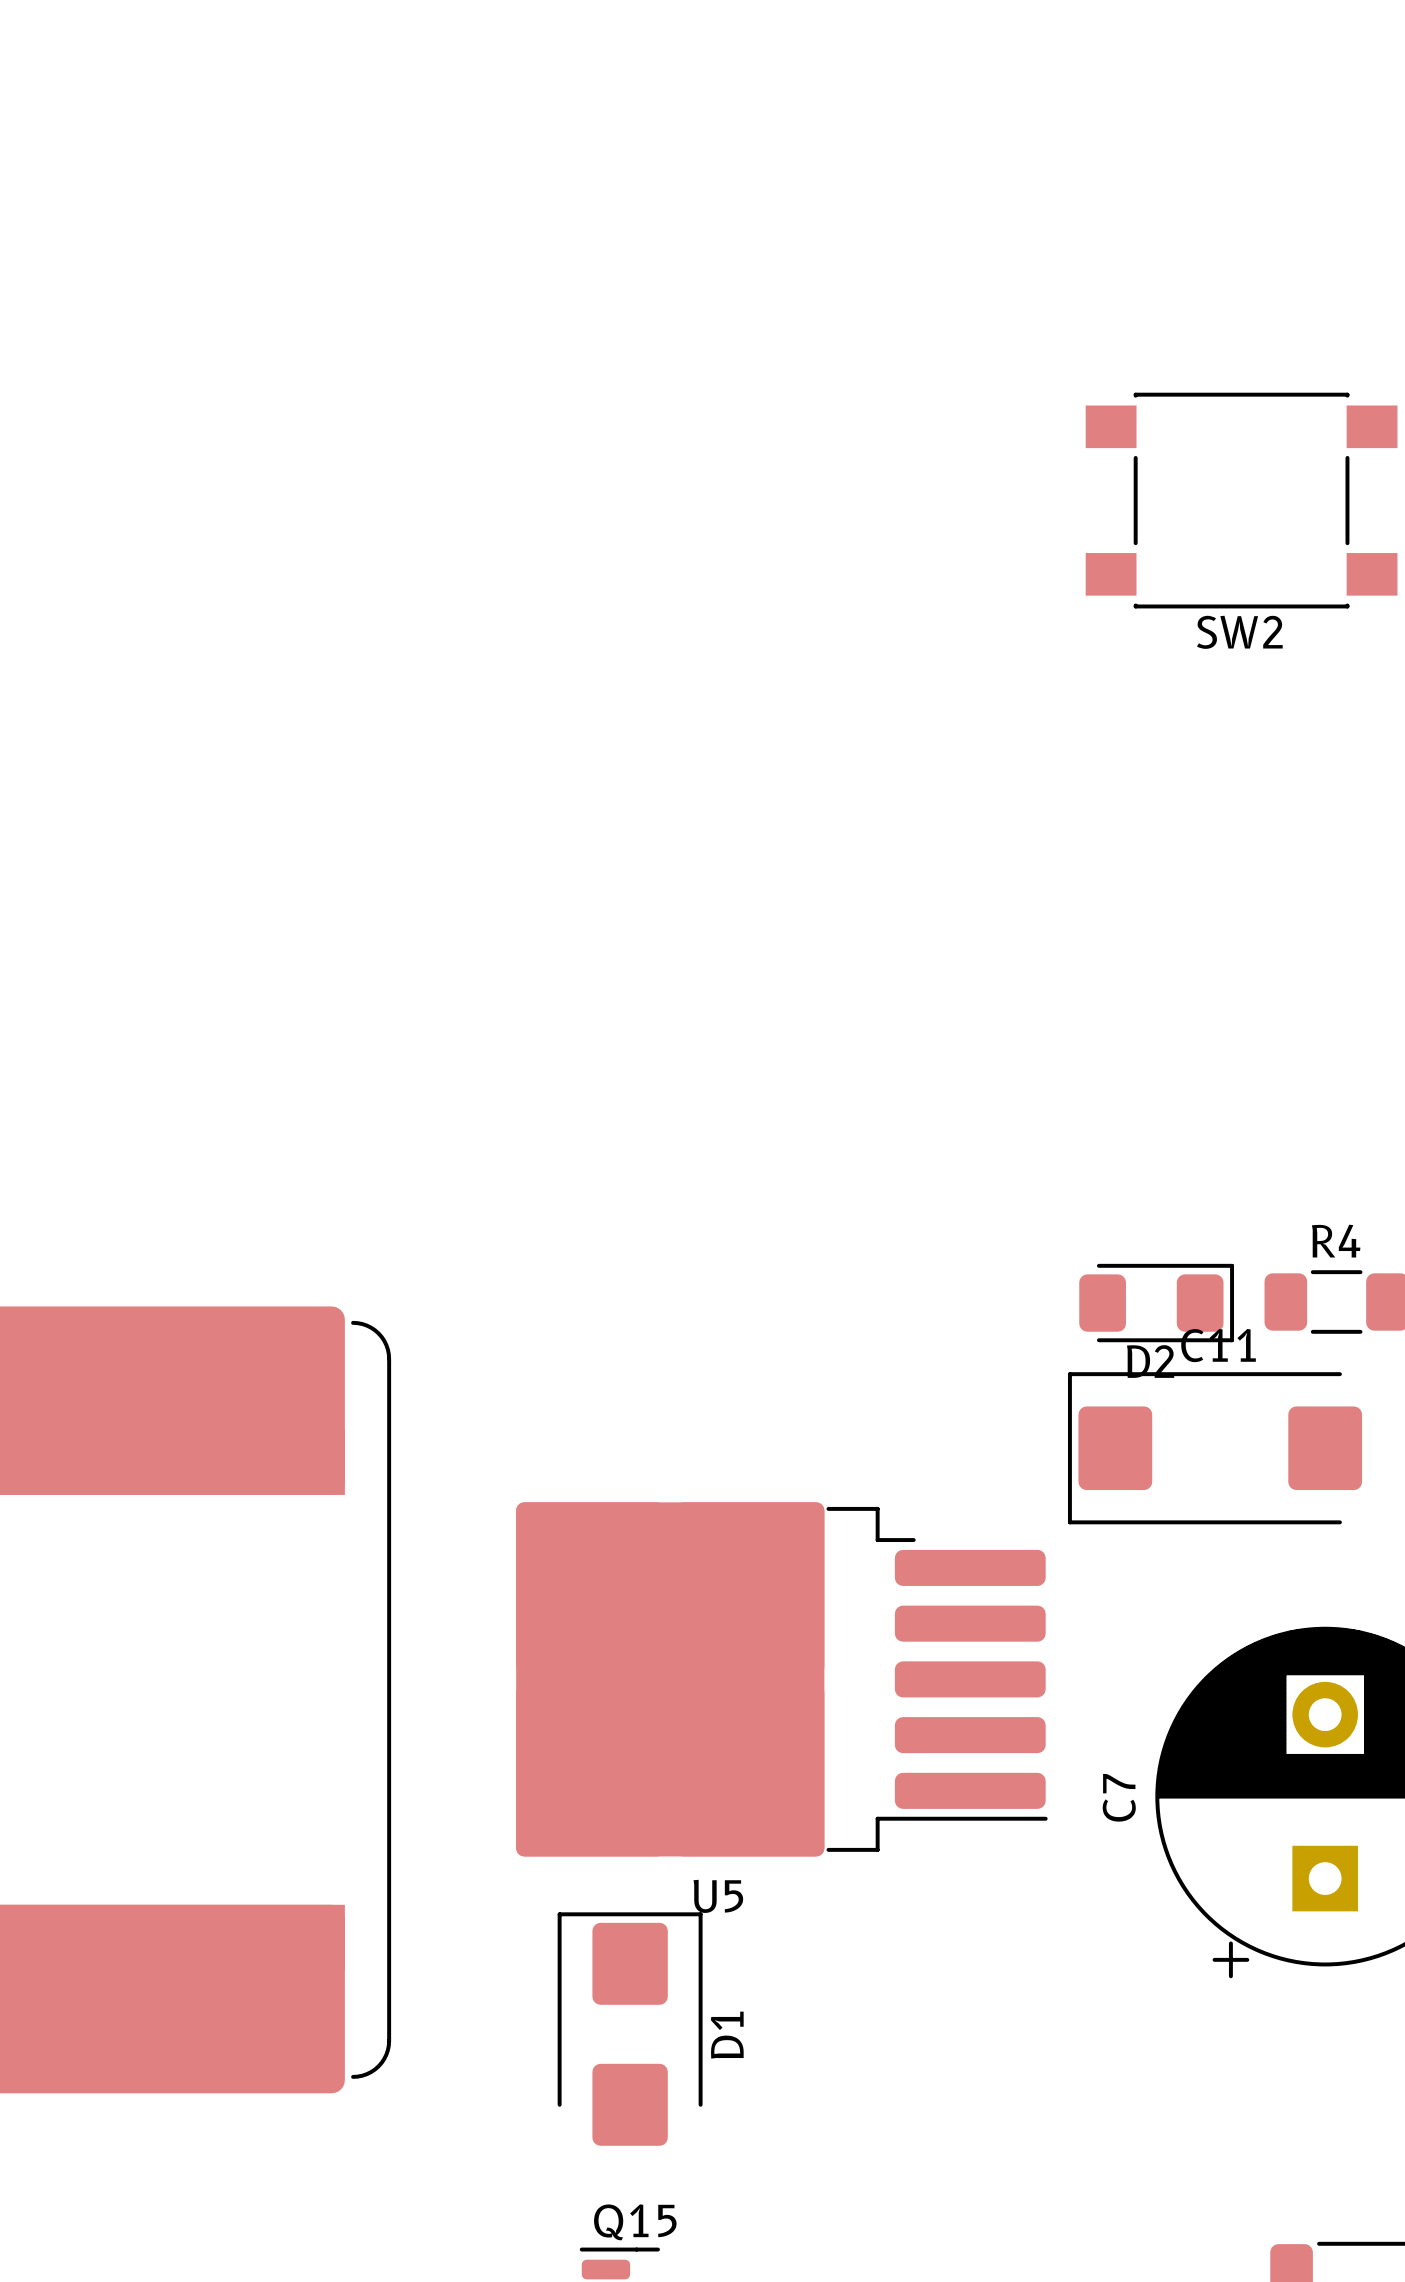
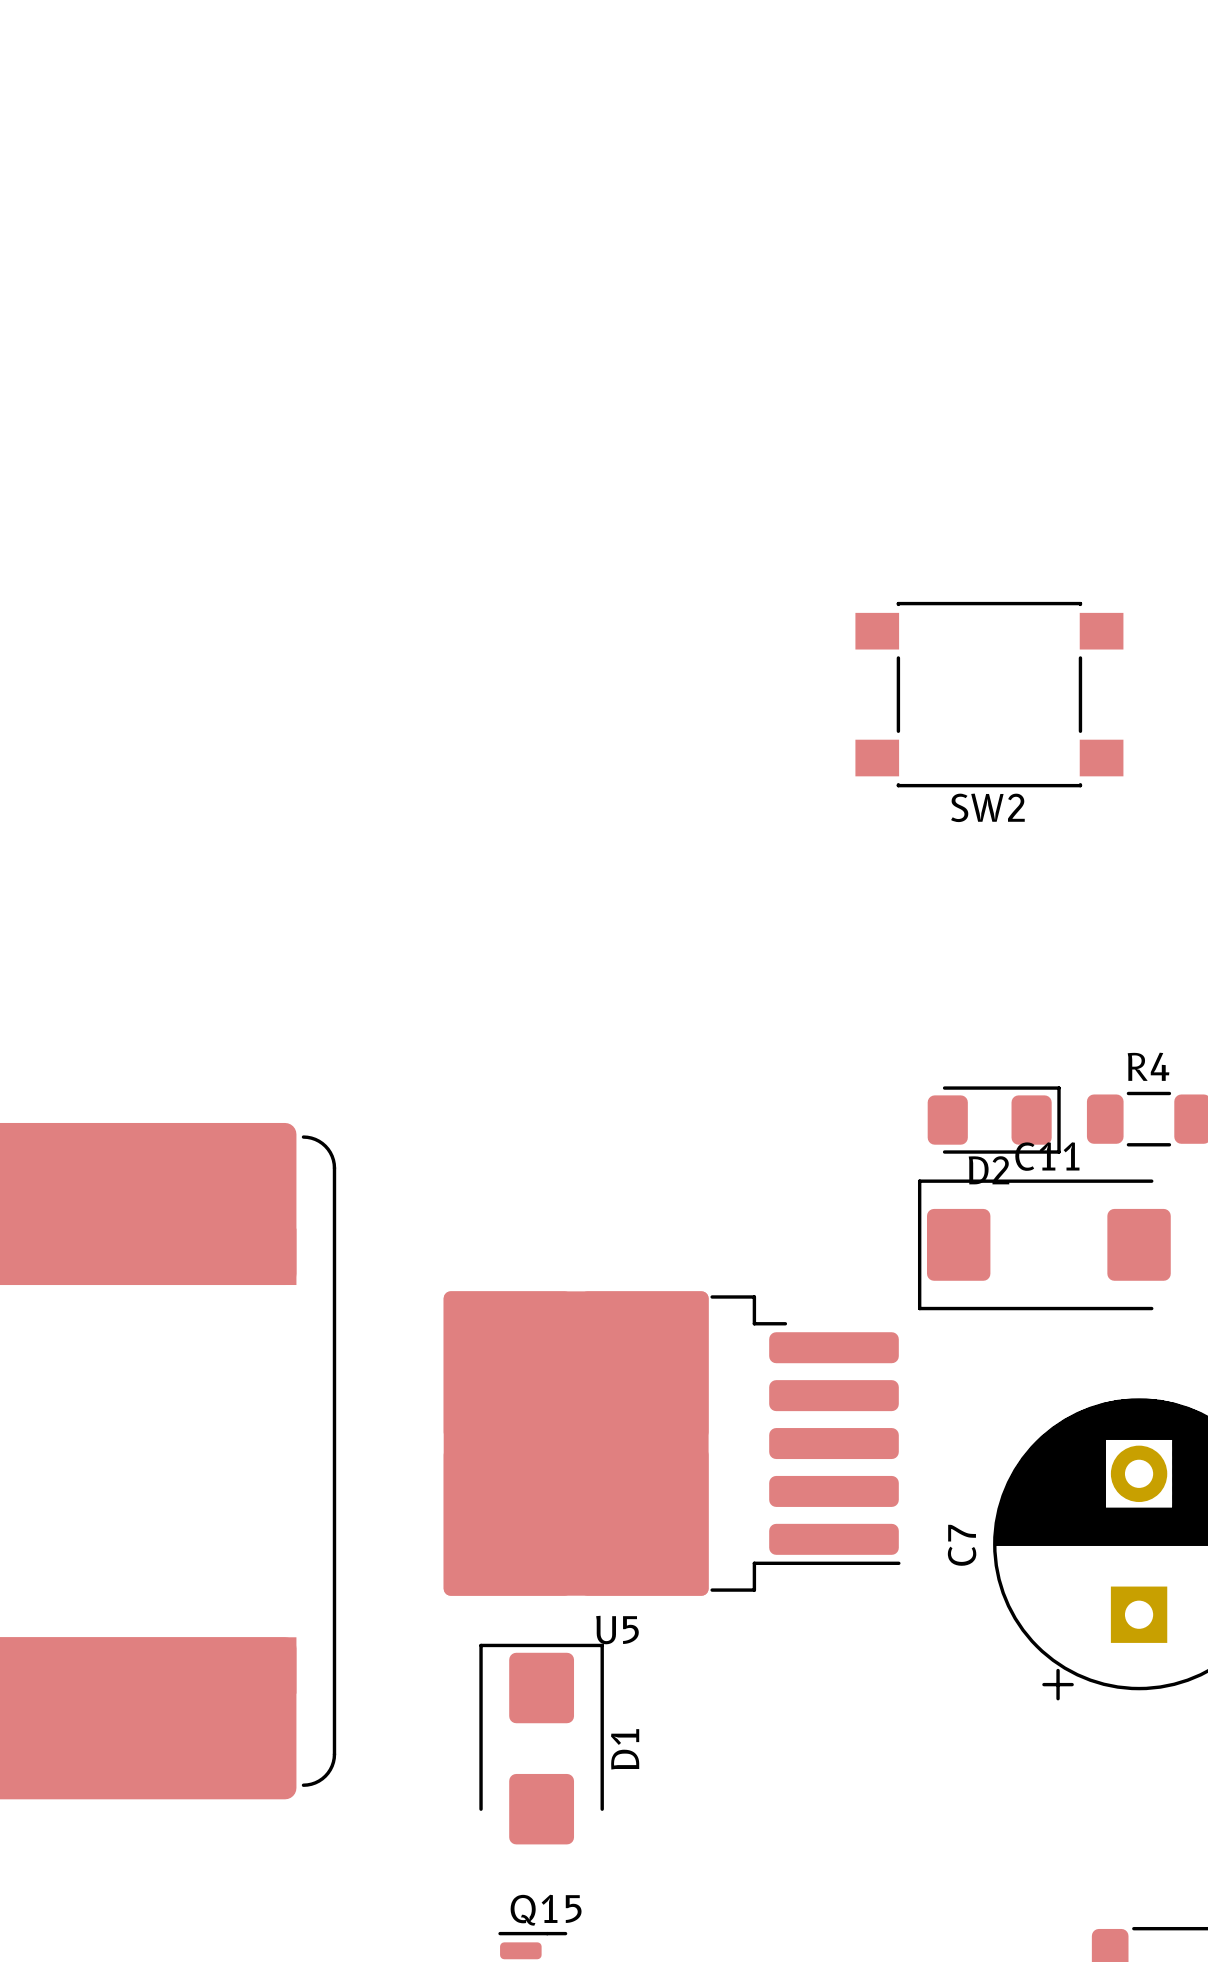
SW2 position: (1241, 500) -> (989, 694)

